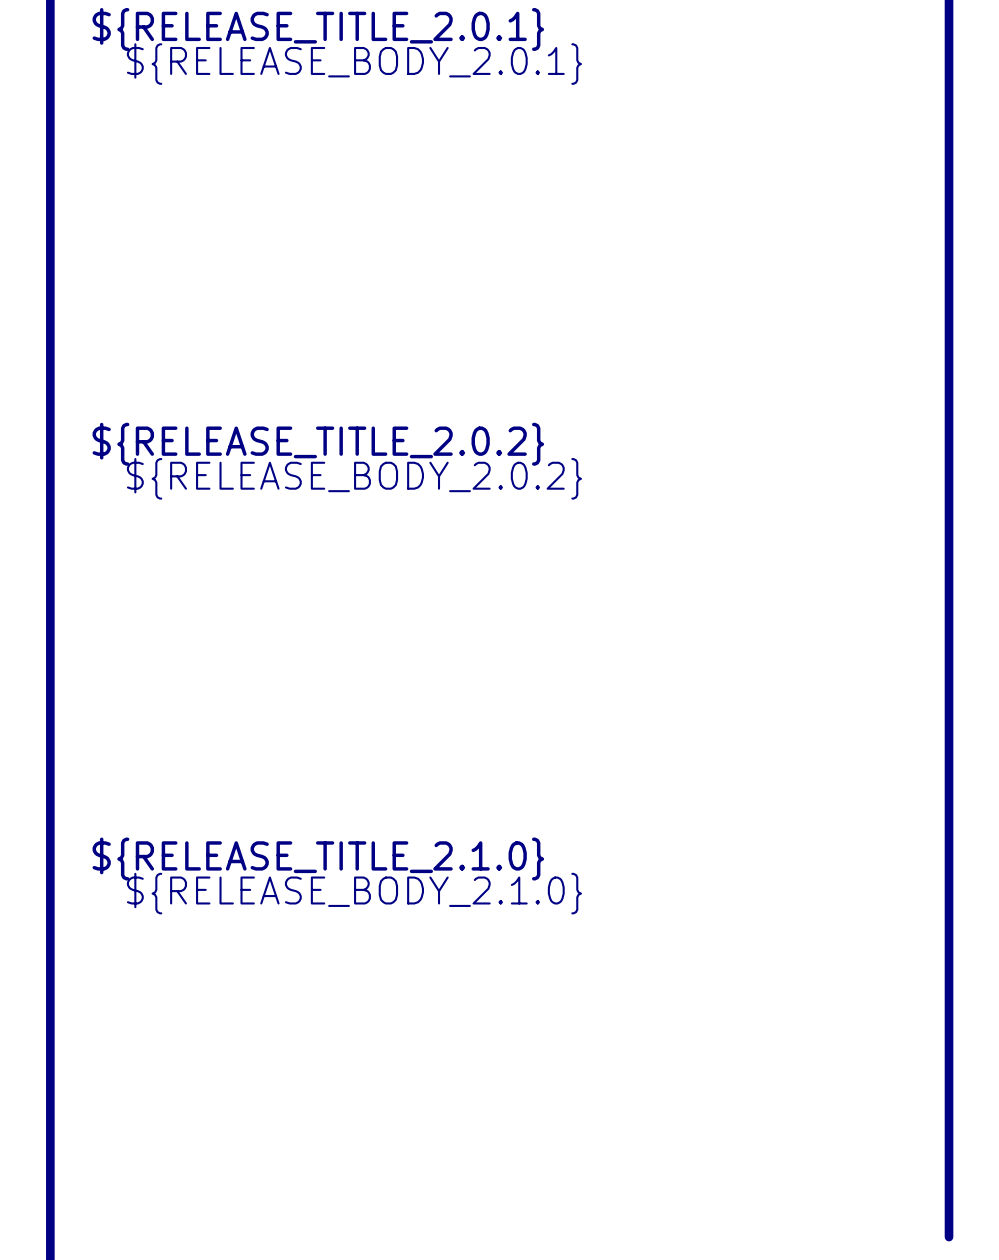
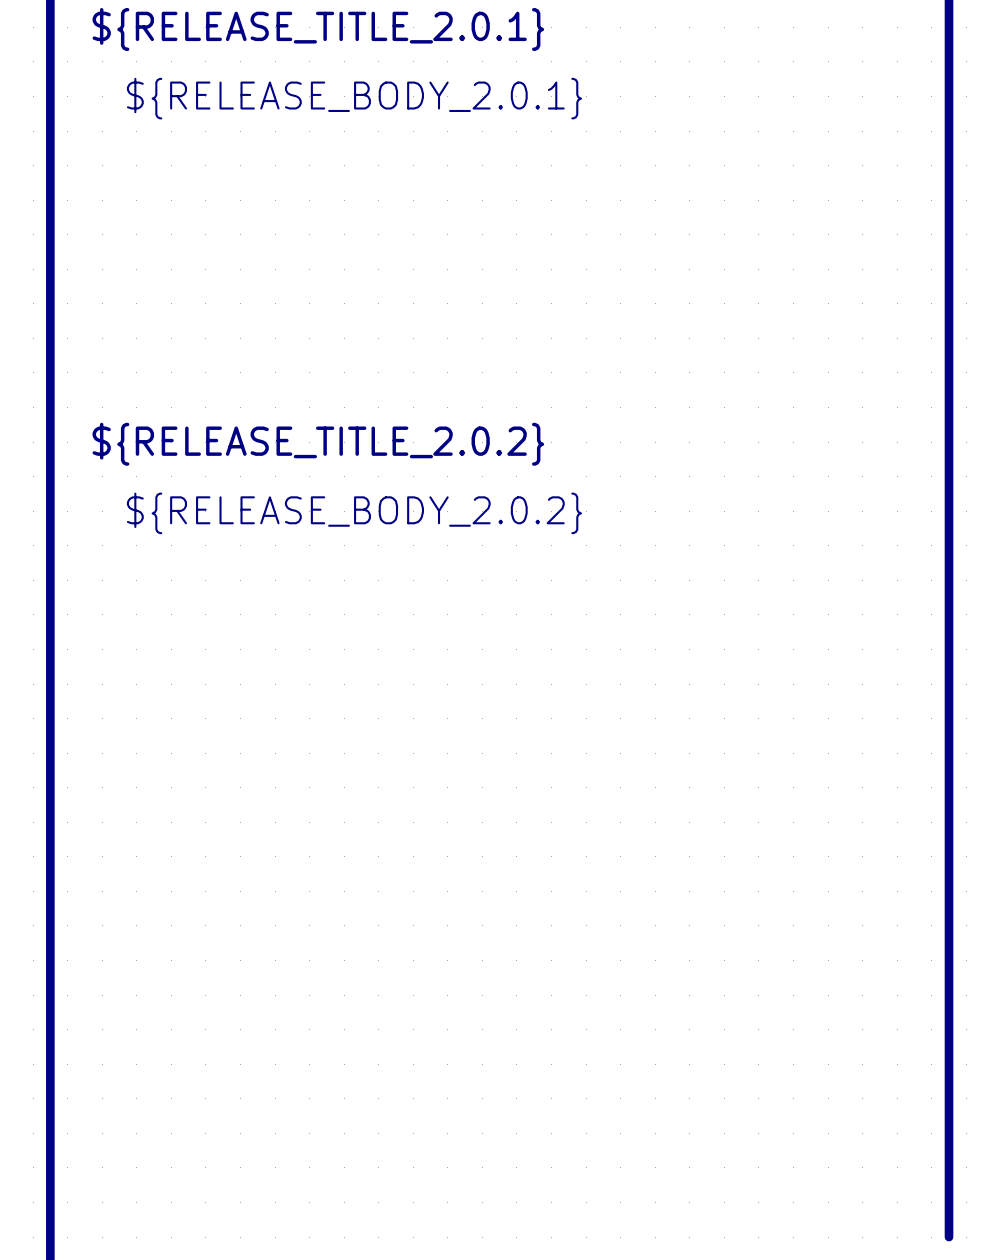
text position: ${RELEASE_BODY_2.0.1} (354, 64) -> ${RELEASE_BODY_2.0.1} (354, 98)
text position: ${RELEASE_BODY_2.0.2} (354, 478) -> ${RELEASE_BODY_2.0.2} (354, 513)
text: ${RELEASE_TITLE_2.1.0} (318, 859) -> none
text: ${RELEASE_BODY_2.1.0} (354, 893) -> none

